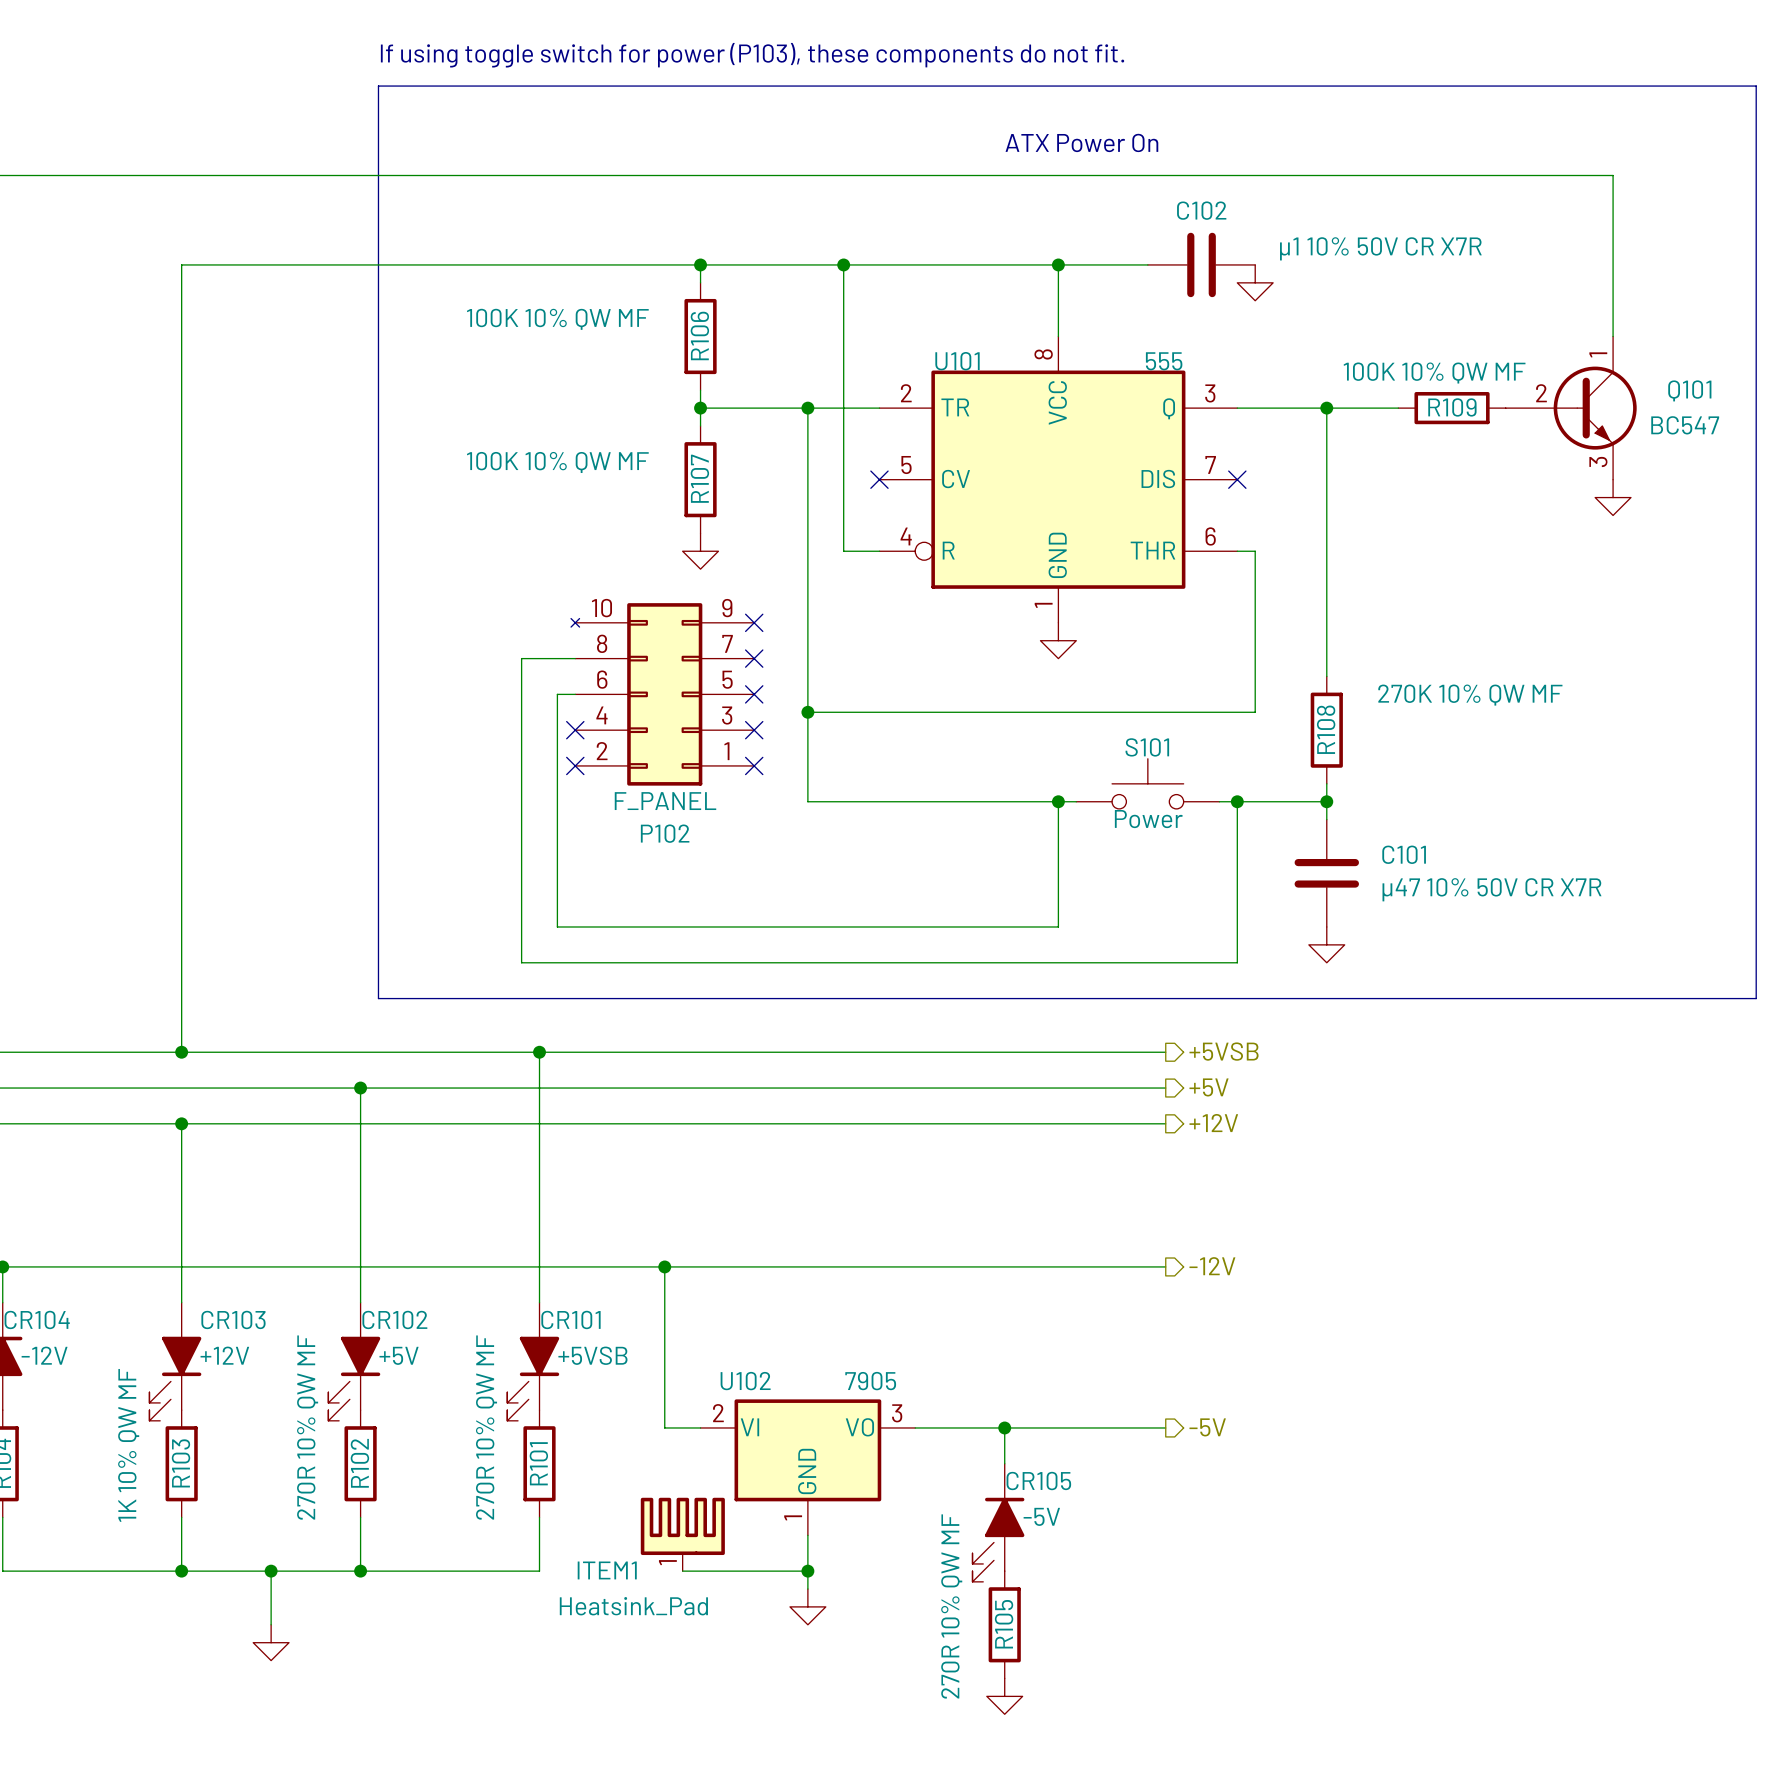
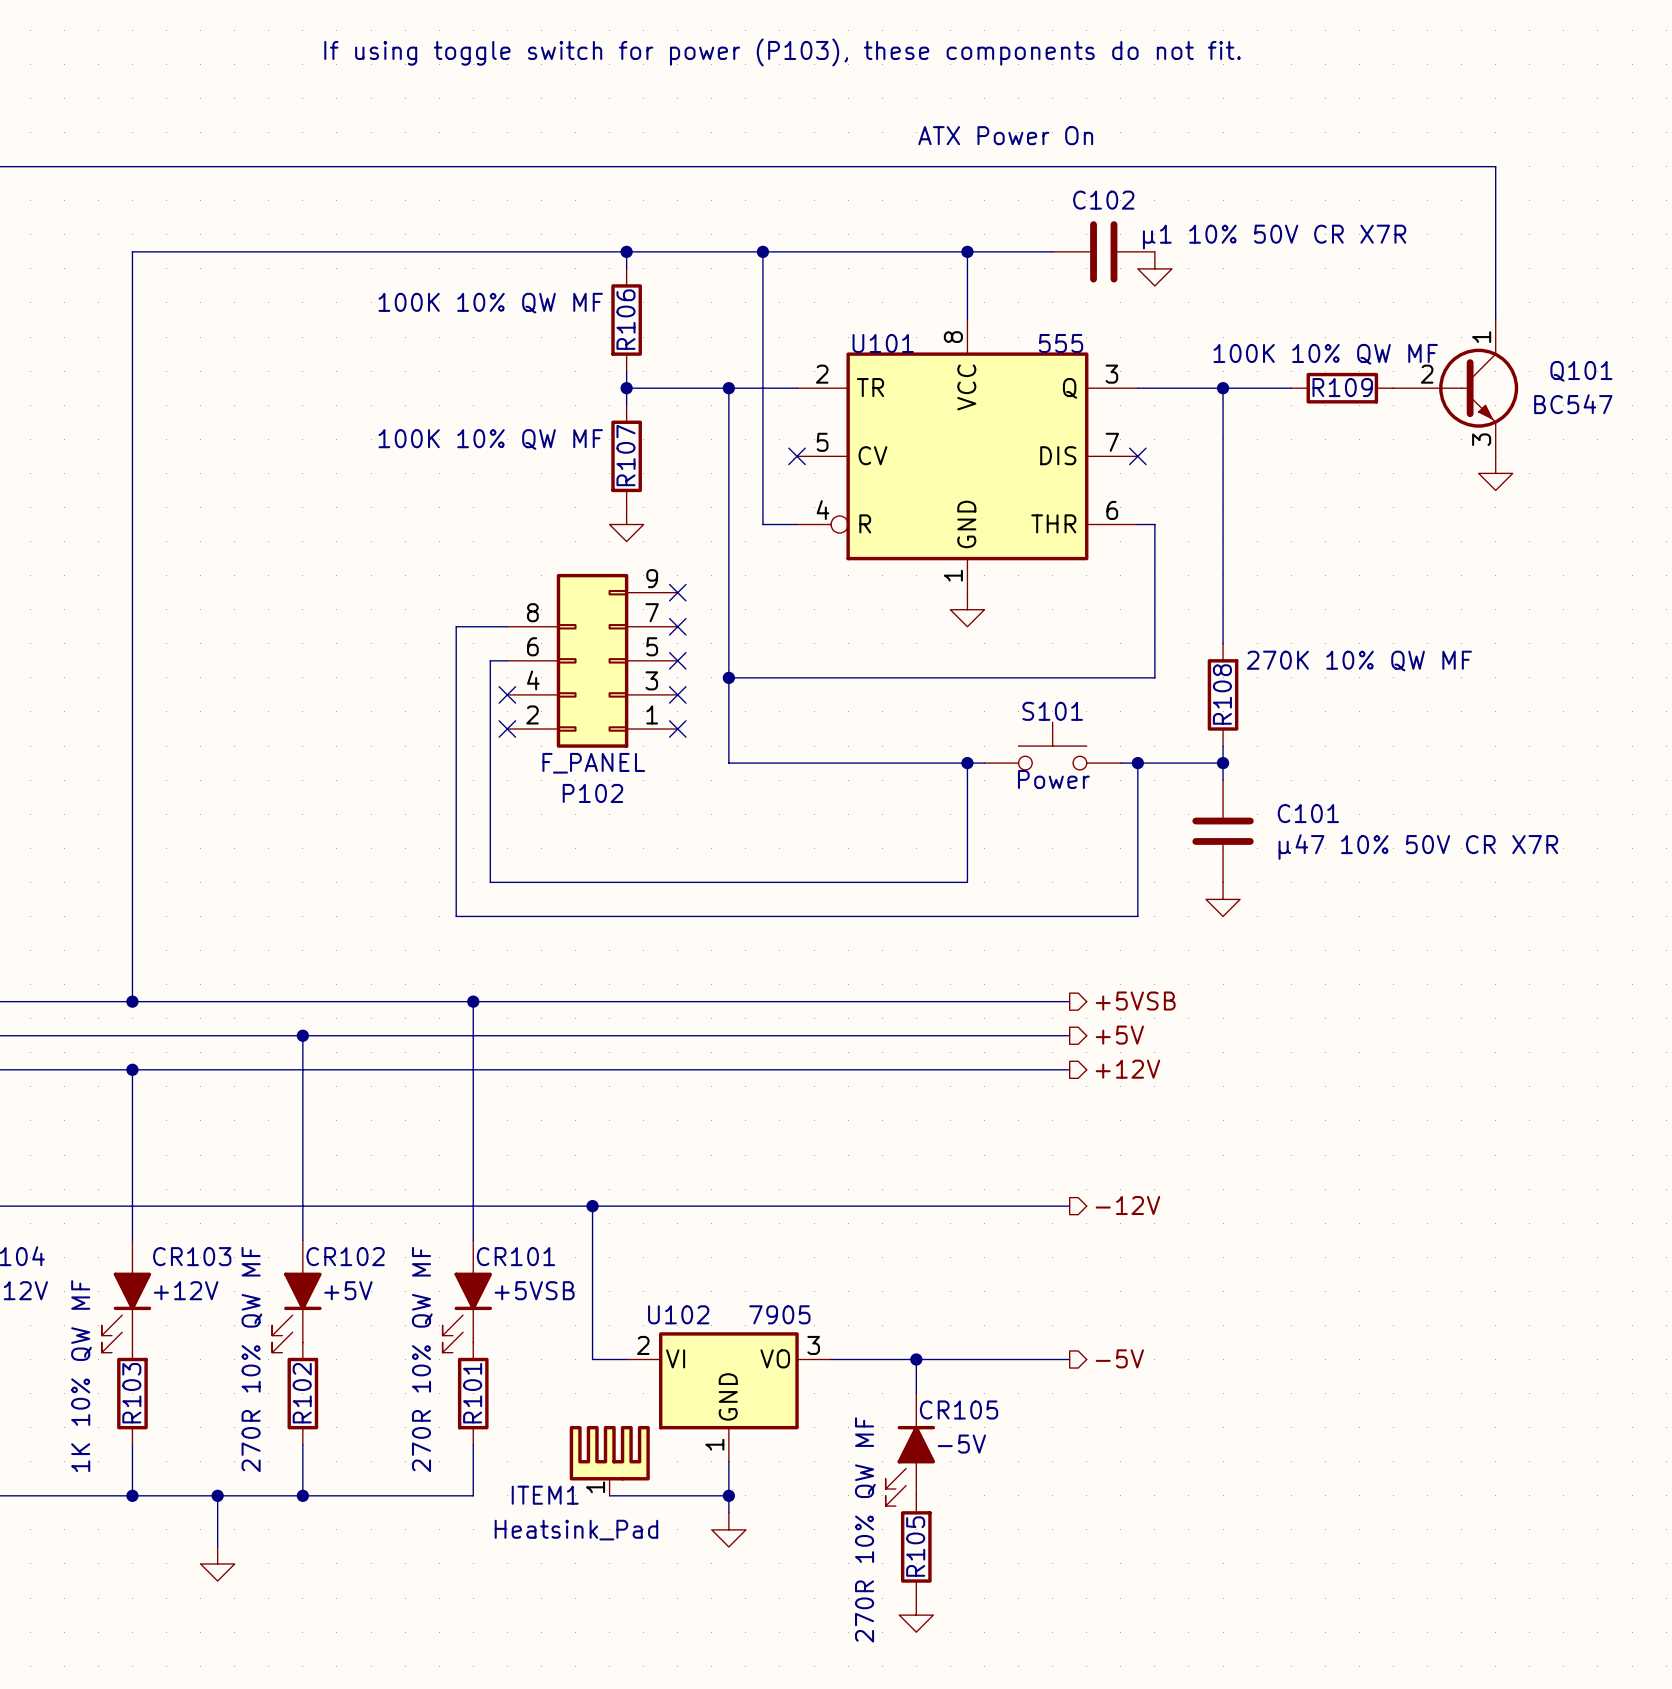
line: (378, 86) (1756, 86) (1756, 998) (378, 998) (378, 86) -> none
P102 symbol: [571, 603, 755, 786] -> [507, 573, 678, 748]

